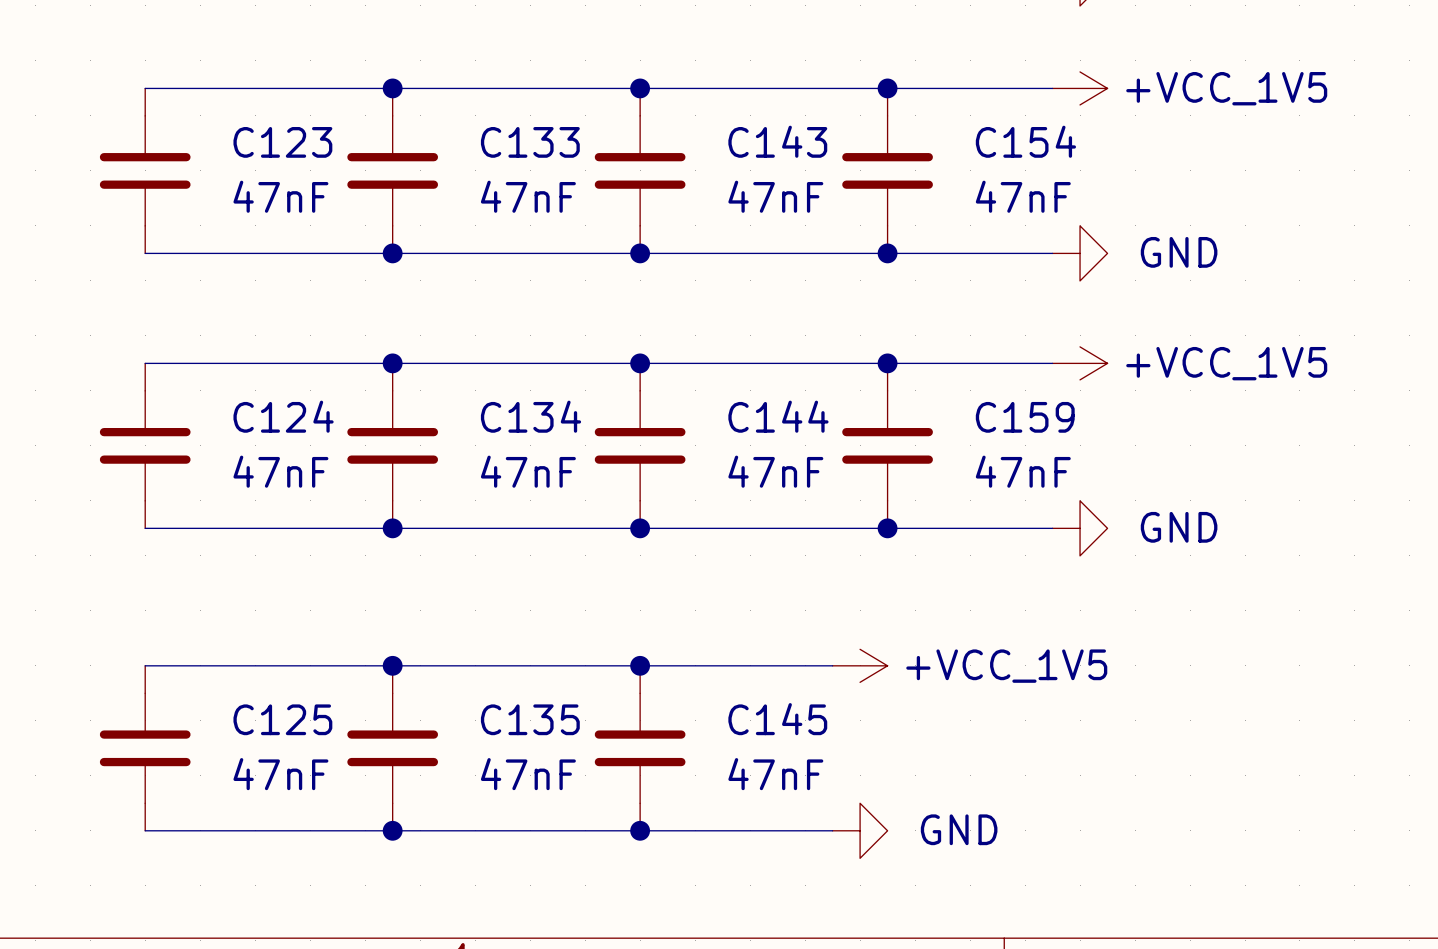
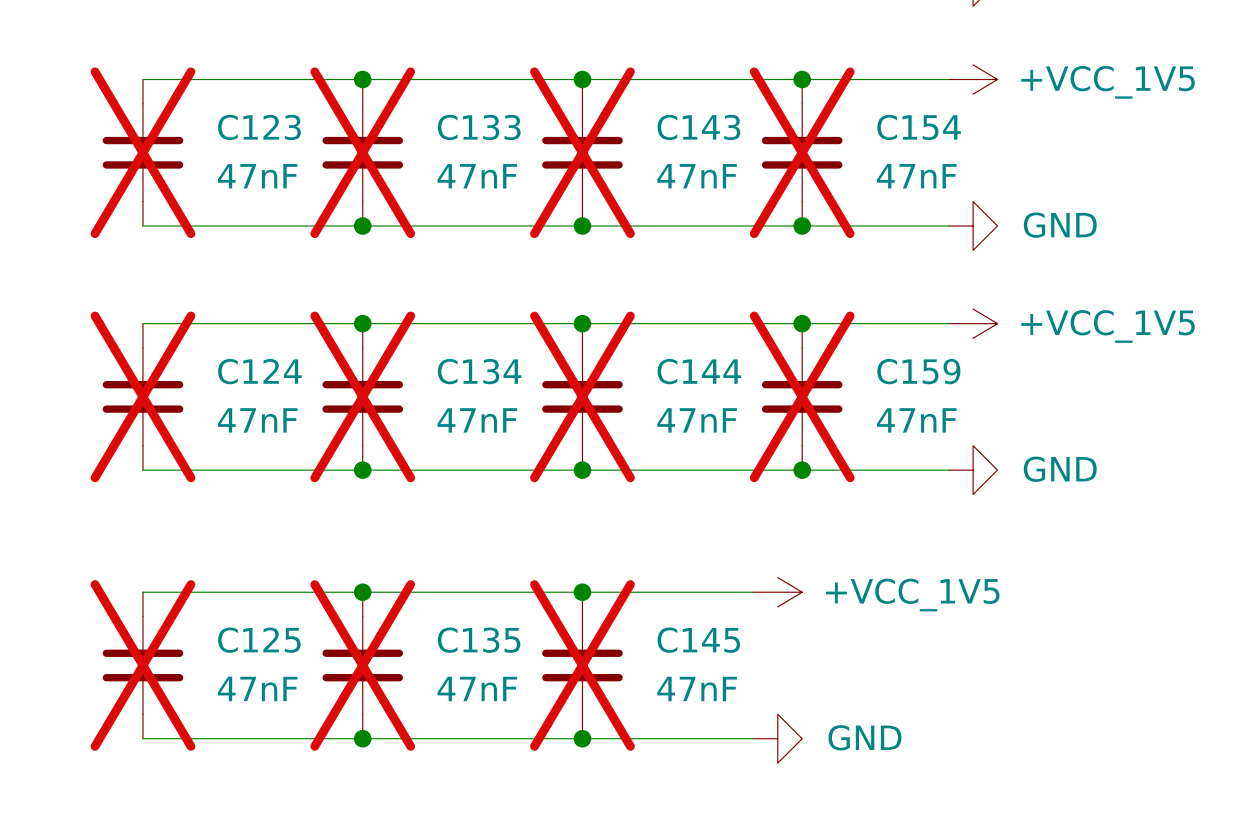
C123 do-not-place cross: none -> (142, 152)
C133 do-not-place cross: none -> (362, 152)
C143 do-not-place cross: none -> (582, 152)
C154 do-not-place cross: none -> (802, 152)
C124 do-not-place cross: none -> (142, 396)
C134 do-not-place cross: none -> (362, 396)
C144 do-not-place cross: none -> (582, 396)
C159 do-not-place cross: none -> (802, 396)
C125 do-not-place cross: none -> (142, 665)
C135 do-not-place cross: none -> (362, 665)
C145 do-not-place cross: none -> (582, 665)

